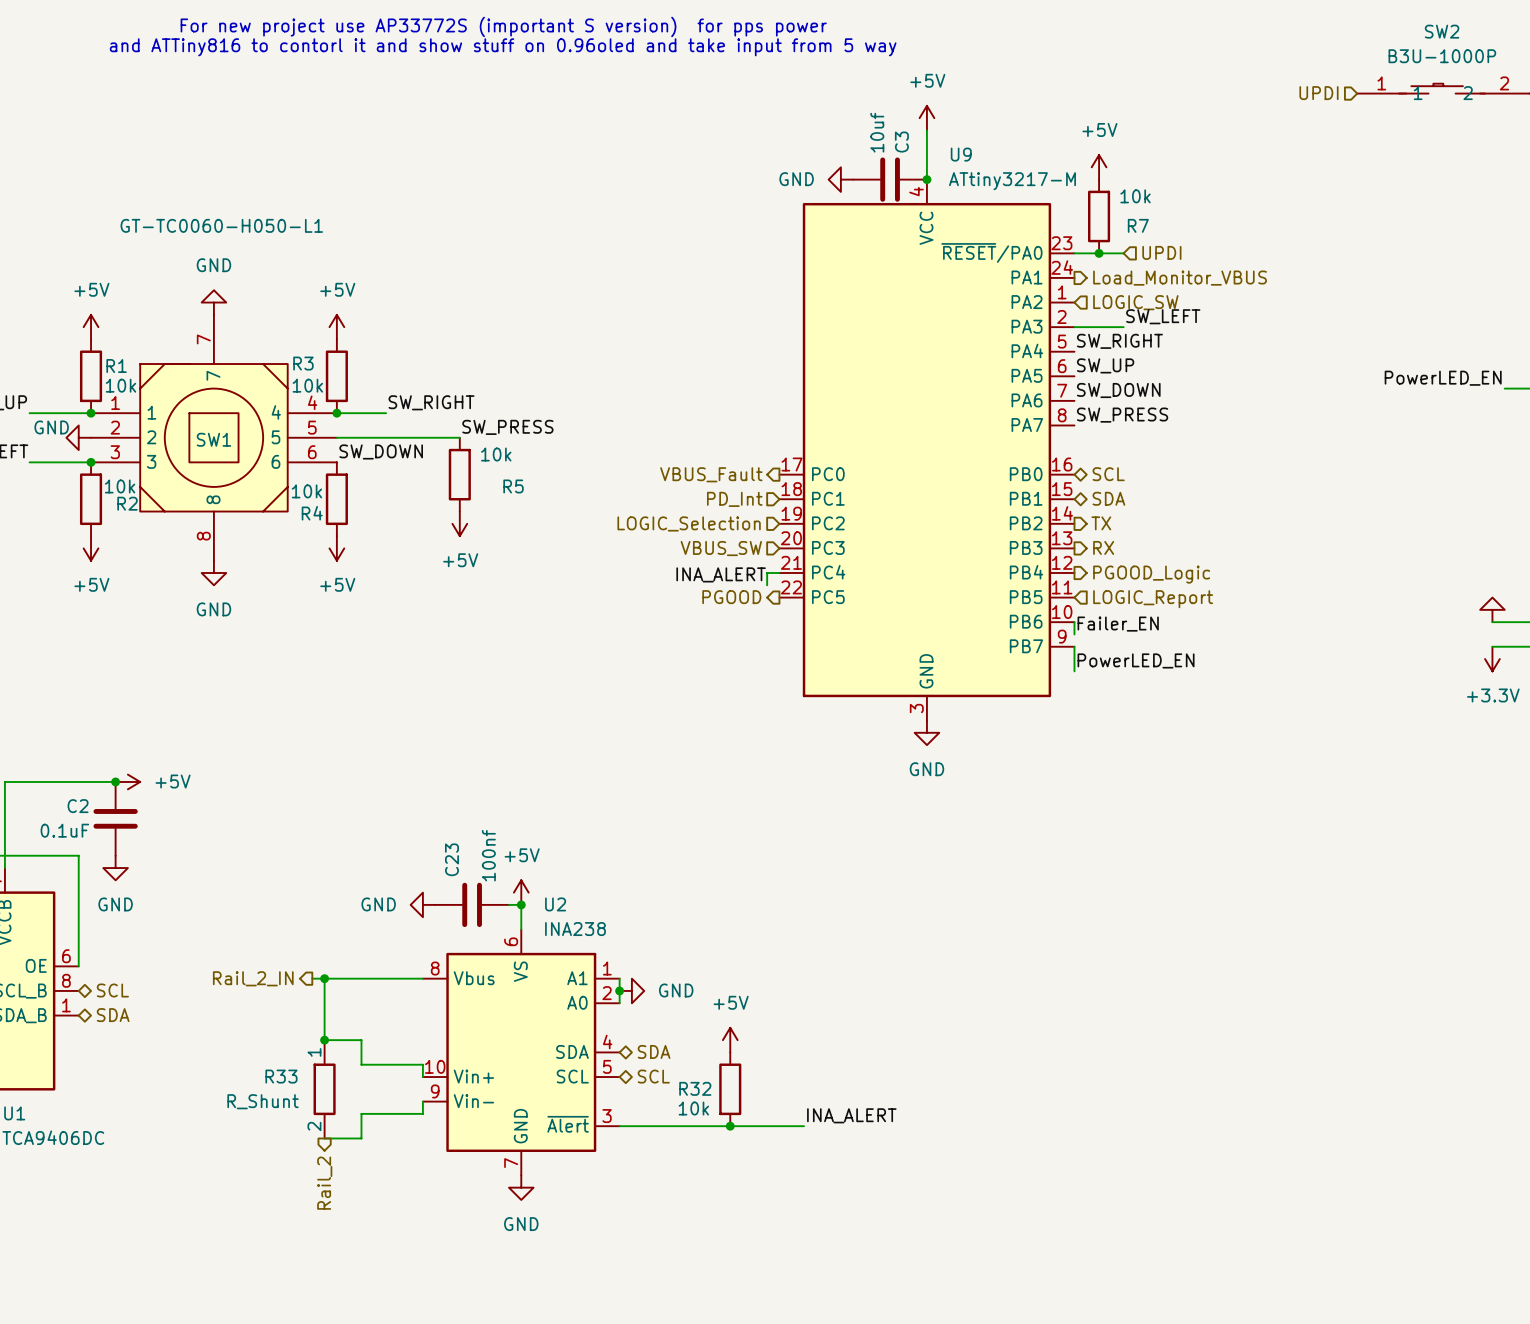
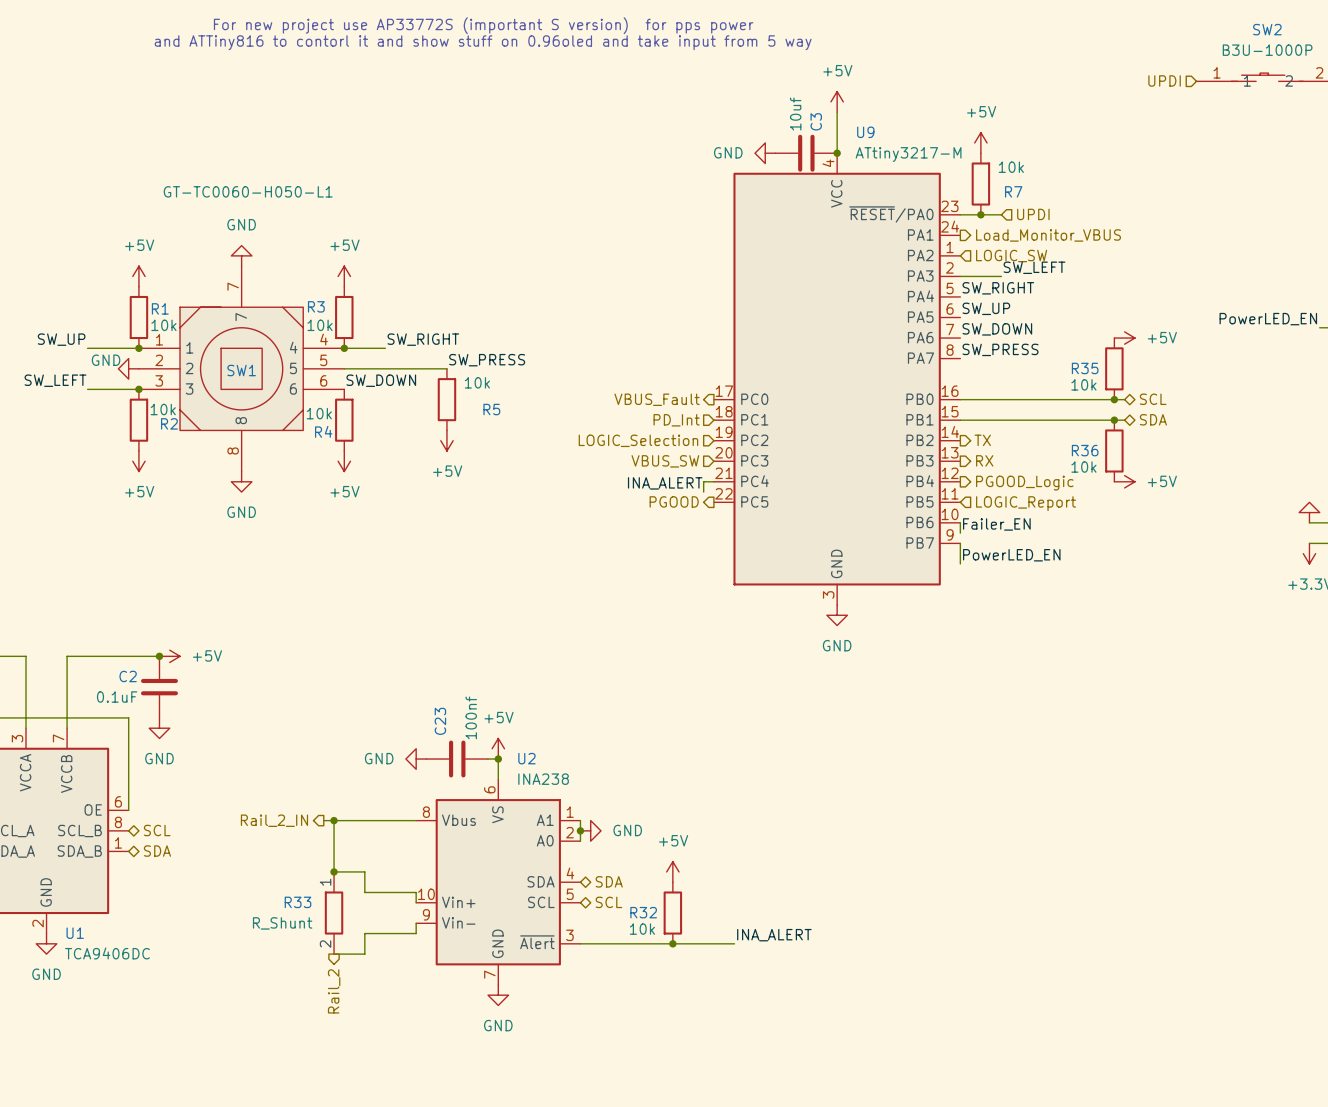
power symbol: none -> +5V (1124, 338)
R35: none -> 10k (1114, 368)
wire: none -> (960, 399) (1124, 399)
hierarchical label position: SCL (1108, 474) -> SCL (1153, 399)
junction: none -> (1114, 399)
hierarchical label position: SDA (1108, 498) -> SDA (1153, 419)
wire: none -> (960, 420) (1124, 420)
junction: none -> (1114, 420)
R36: none -> 10k (1114, 450)
power symbol: none -> +5V (1124, 481)

